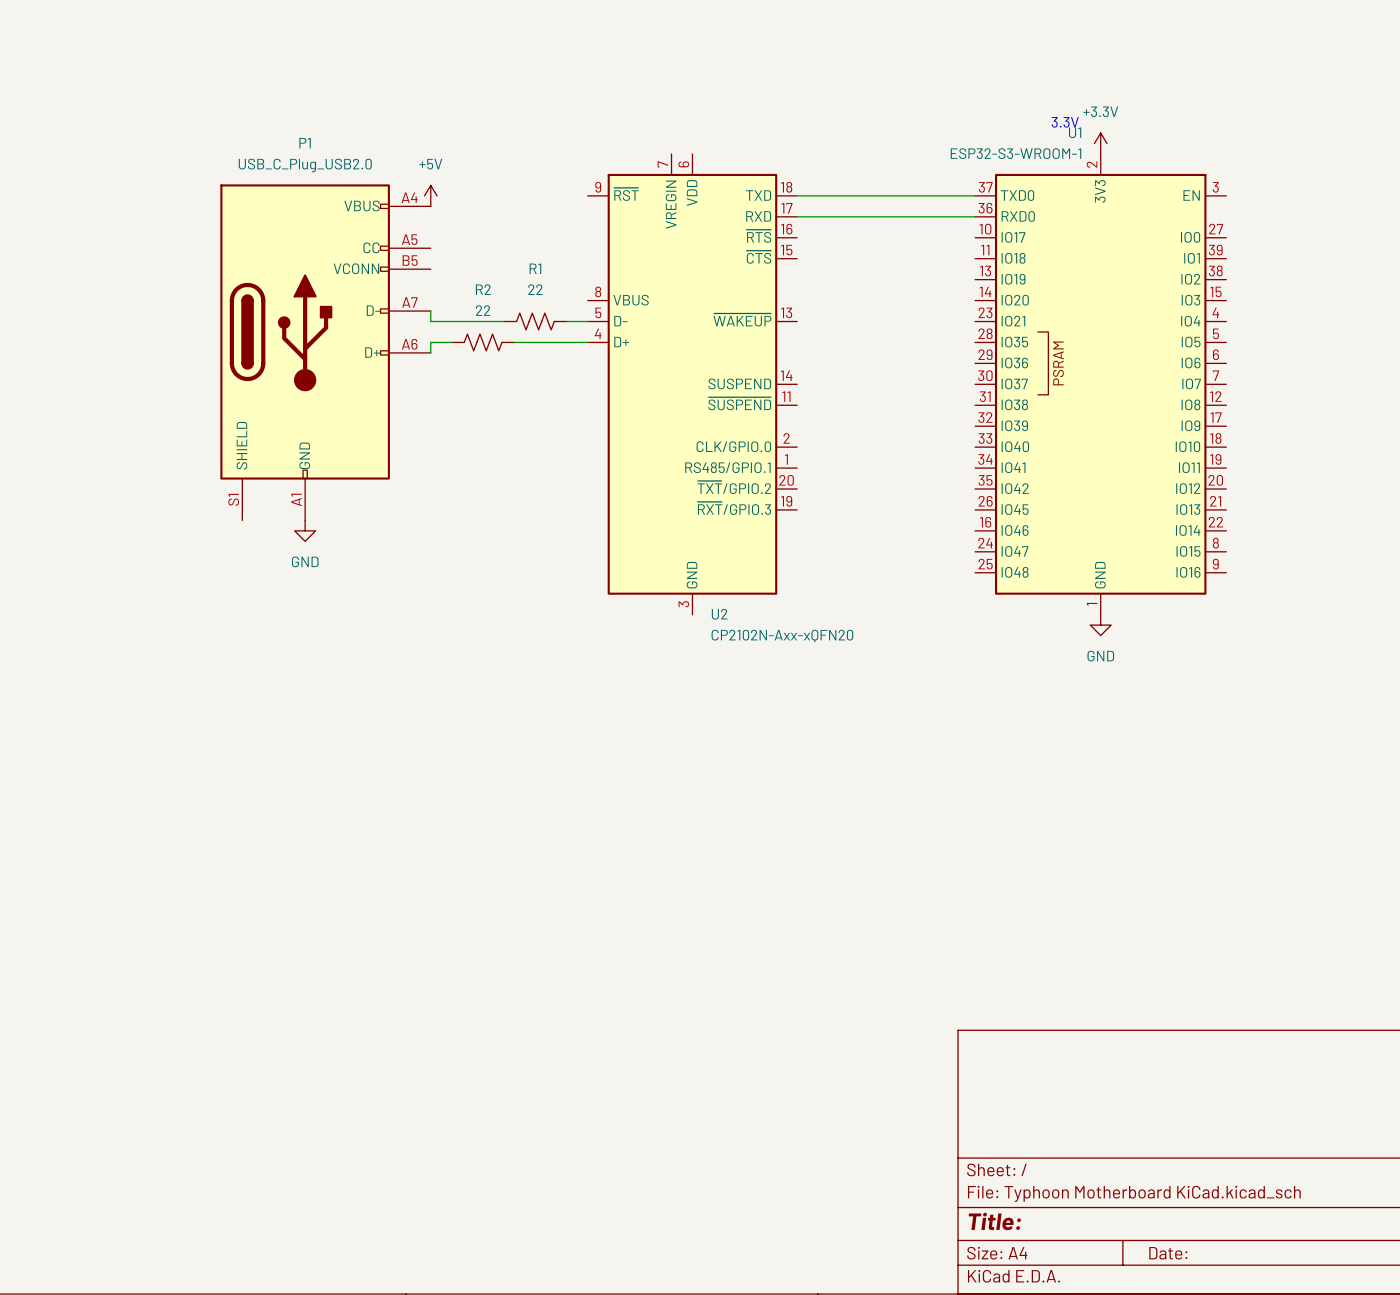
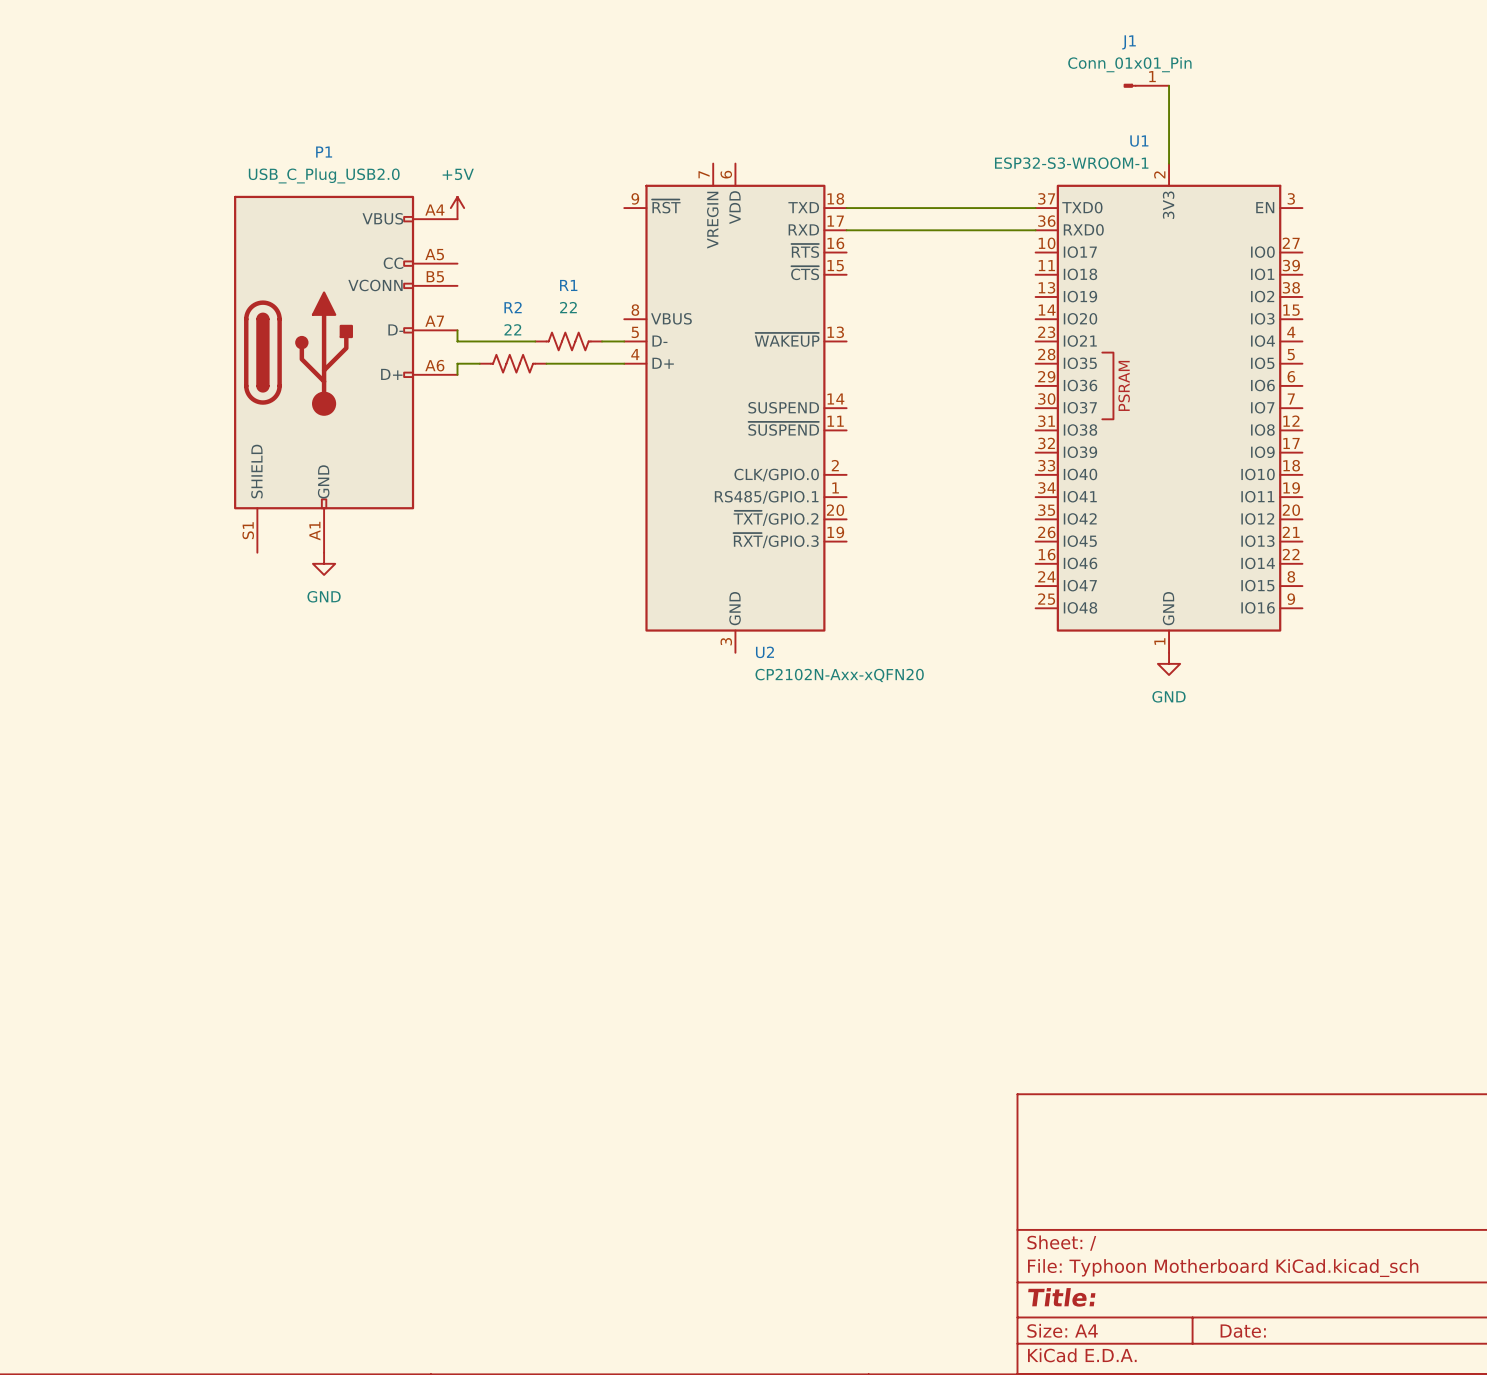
J1: none -> Conn_01x01_Pin (1146, 85)
wire: none -> (1169, 85) (1169, 163)
text: 3.3V (1065, 122) -> none
power symbol: +3.3V (1100, 143) -> none

